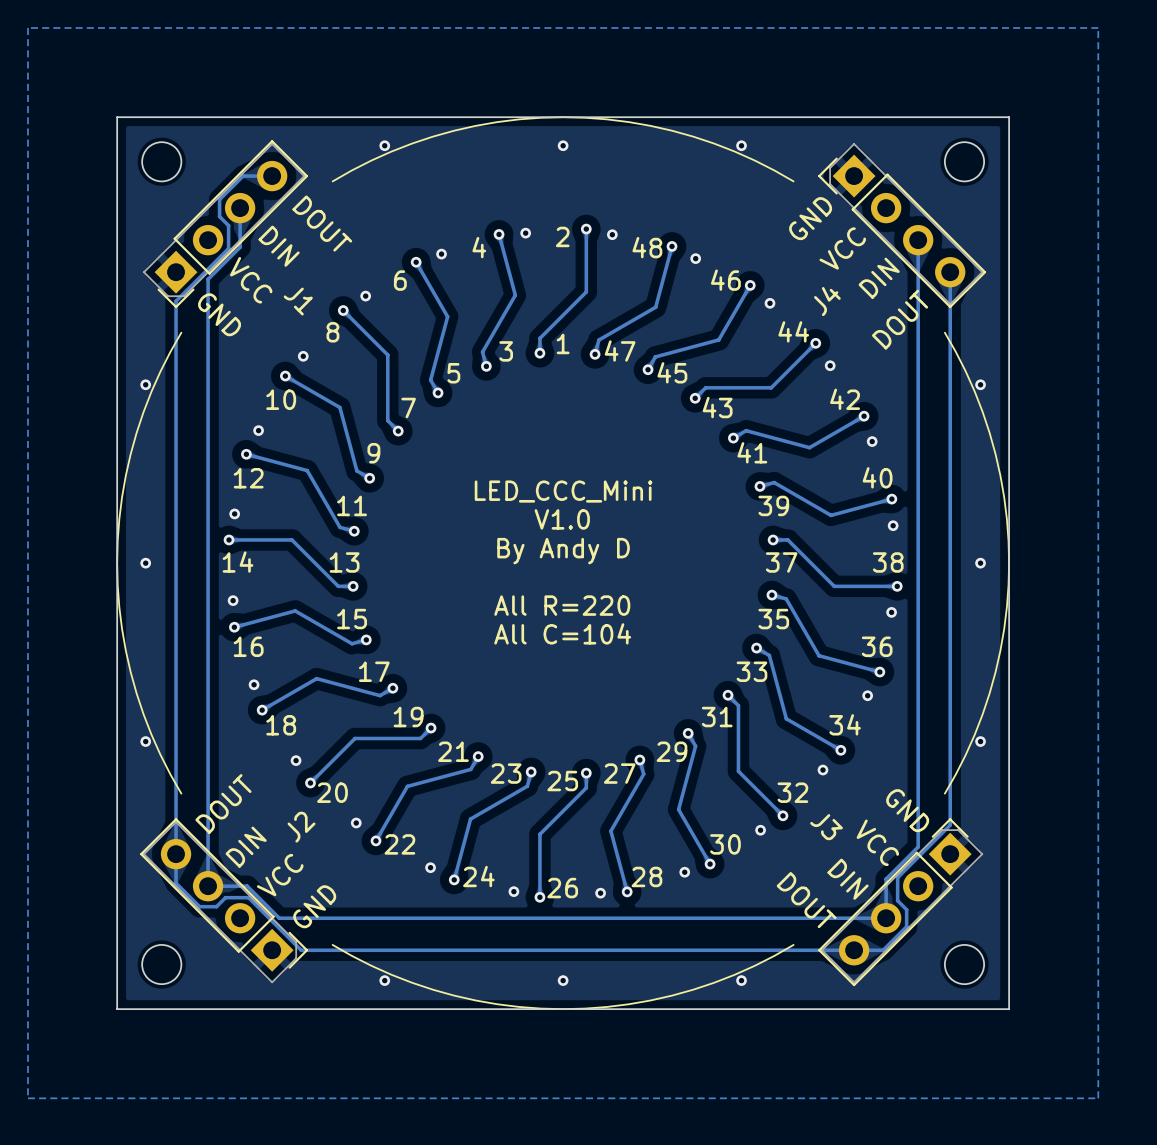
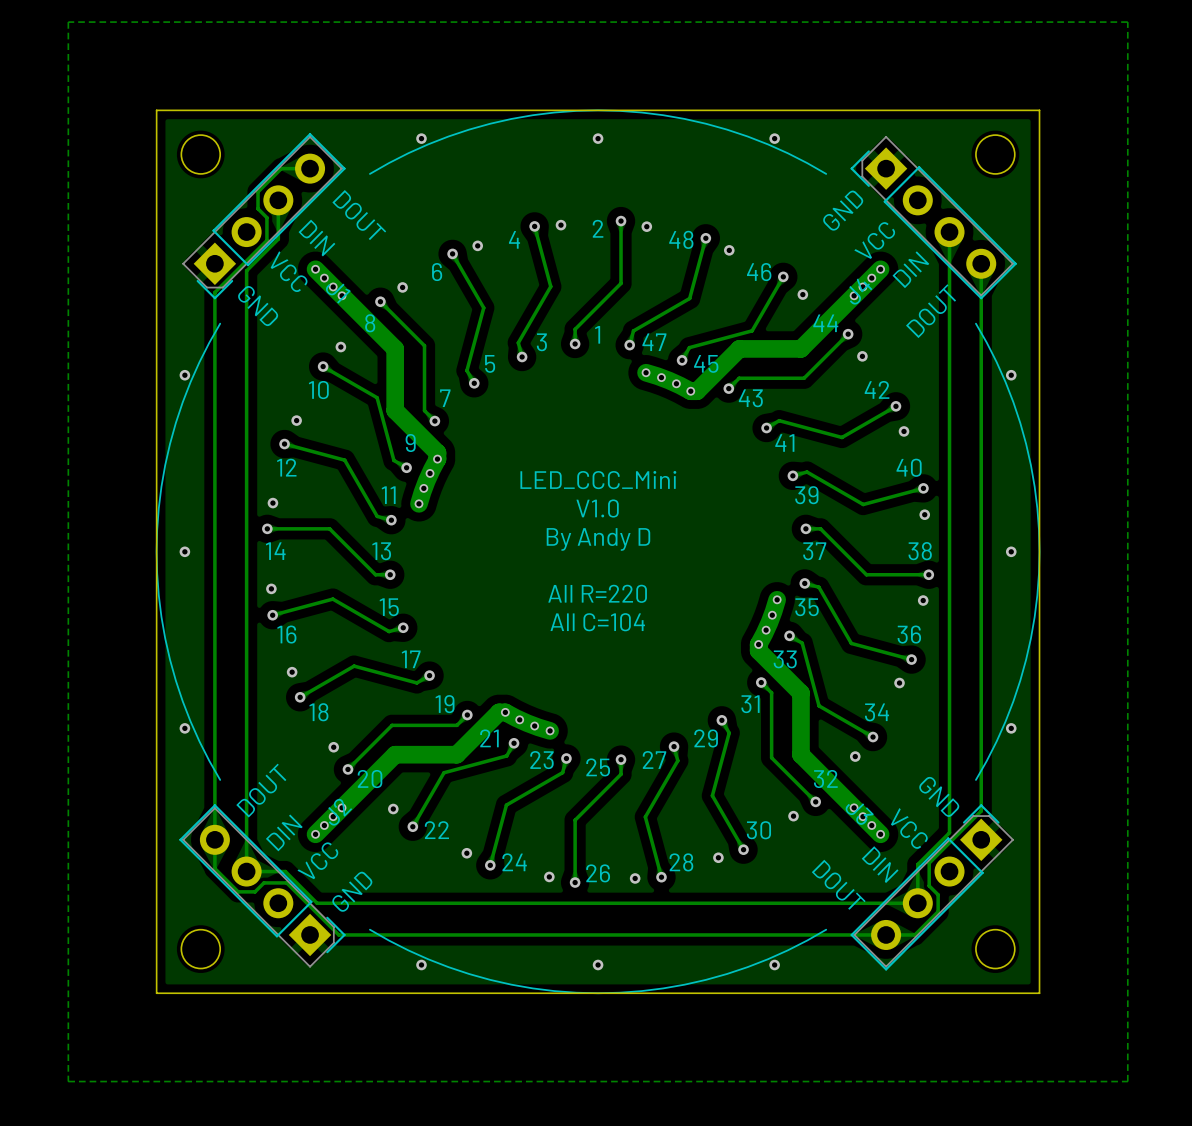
track: none -> (315, 269) (395, 348) (395, 410) (437, 452) (437, 459) (426, 480) (418, 503)
via: none -> (315, 269)
track: none -> (880, 269) (800, 348) (739, 348) (697, 391) (690, 391) (669, 380) (646, 372)
via: none -> (880, 269)
via: none -> (324, 278)
via: none -> (871, 278)
via: none -> (333, 286)
via: none -> (862, 286)
via: none -> (342, 295)
via: none -> (854, 295)
via: none -> (646, 372)
via: none -> (661, 377)
via: none -> (676, 383)
via: none -> (690, 391)
via: none -> (437, 459)
via: none -> (430, 473)
via: none -> (423, 488)
via: none -> (418, 503)
track: none -> (777, 599) (769, 622) (758, 644) (758, 650) (800, 693) (800, 754) (880, 834)
via: none -> (777, 599)
via: none -> (772, 615)
via: none -> (766, 630)
via: none -> (758, 644)
via: none -> (505, 712)
via: none -> (519, 719)
via: none -> (534, 726)
track: none -> (550, 730) (527, 723) (505, 712) (499, 712) (456, 754) (395, 754) (315, 834)
via: none -> (550, 730)
via: none -> (342, 807)
via: none -> (854, 807)
via: none -> (333, 816)
via: none -> (862, 816)
via: none -> (324, 825)
via: none -> (871, 825)
via: none -> (315, 834)
via: none -> (880, 834)

